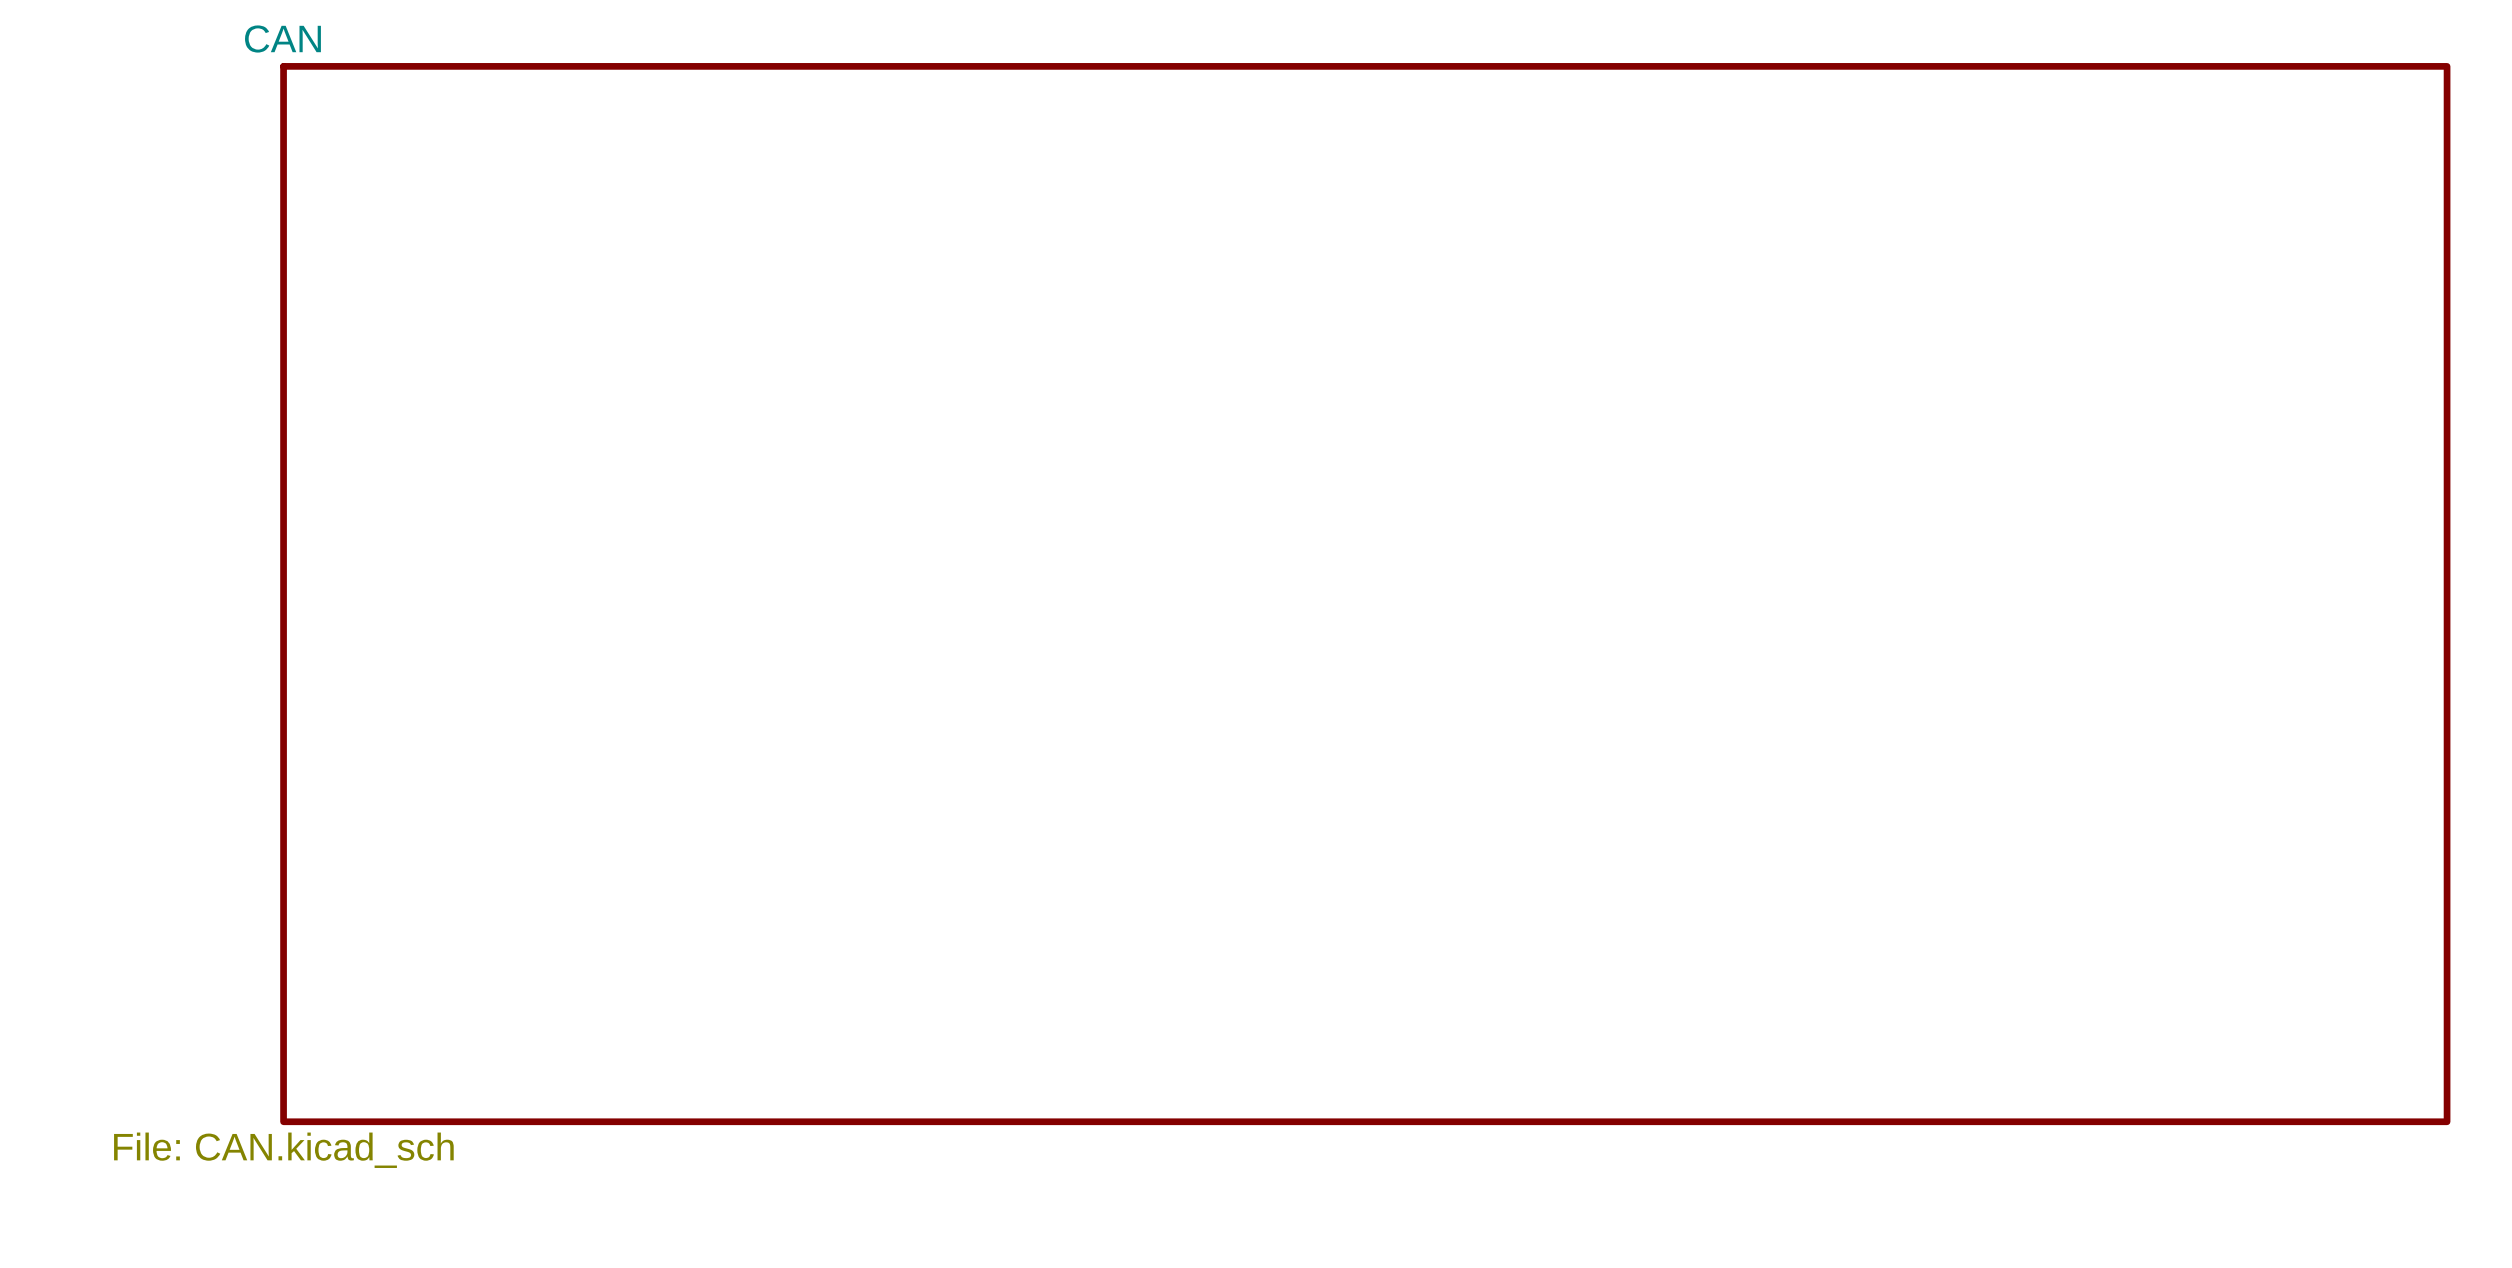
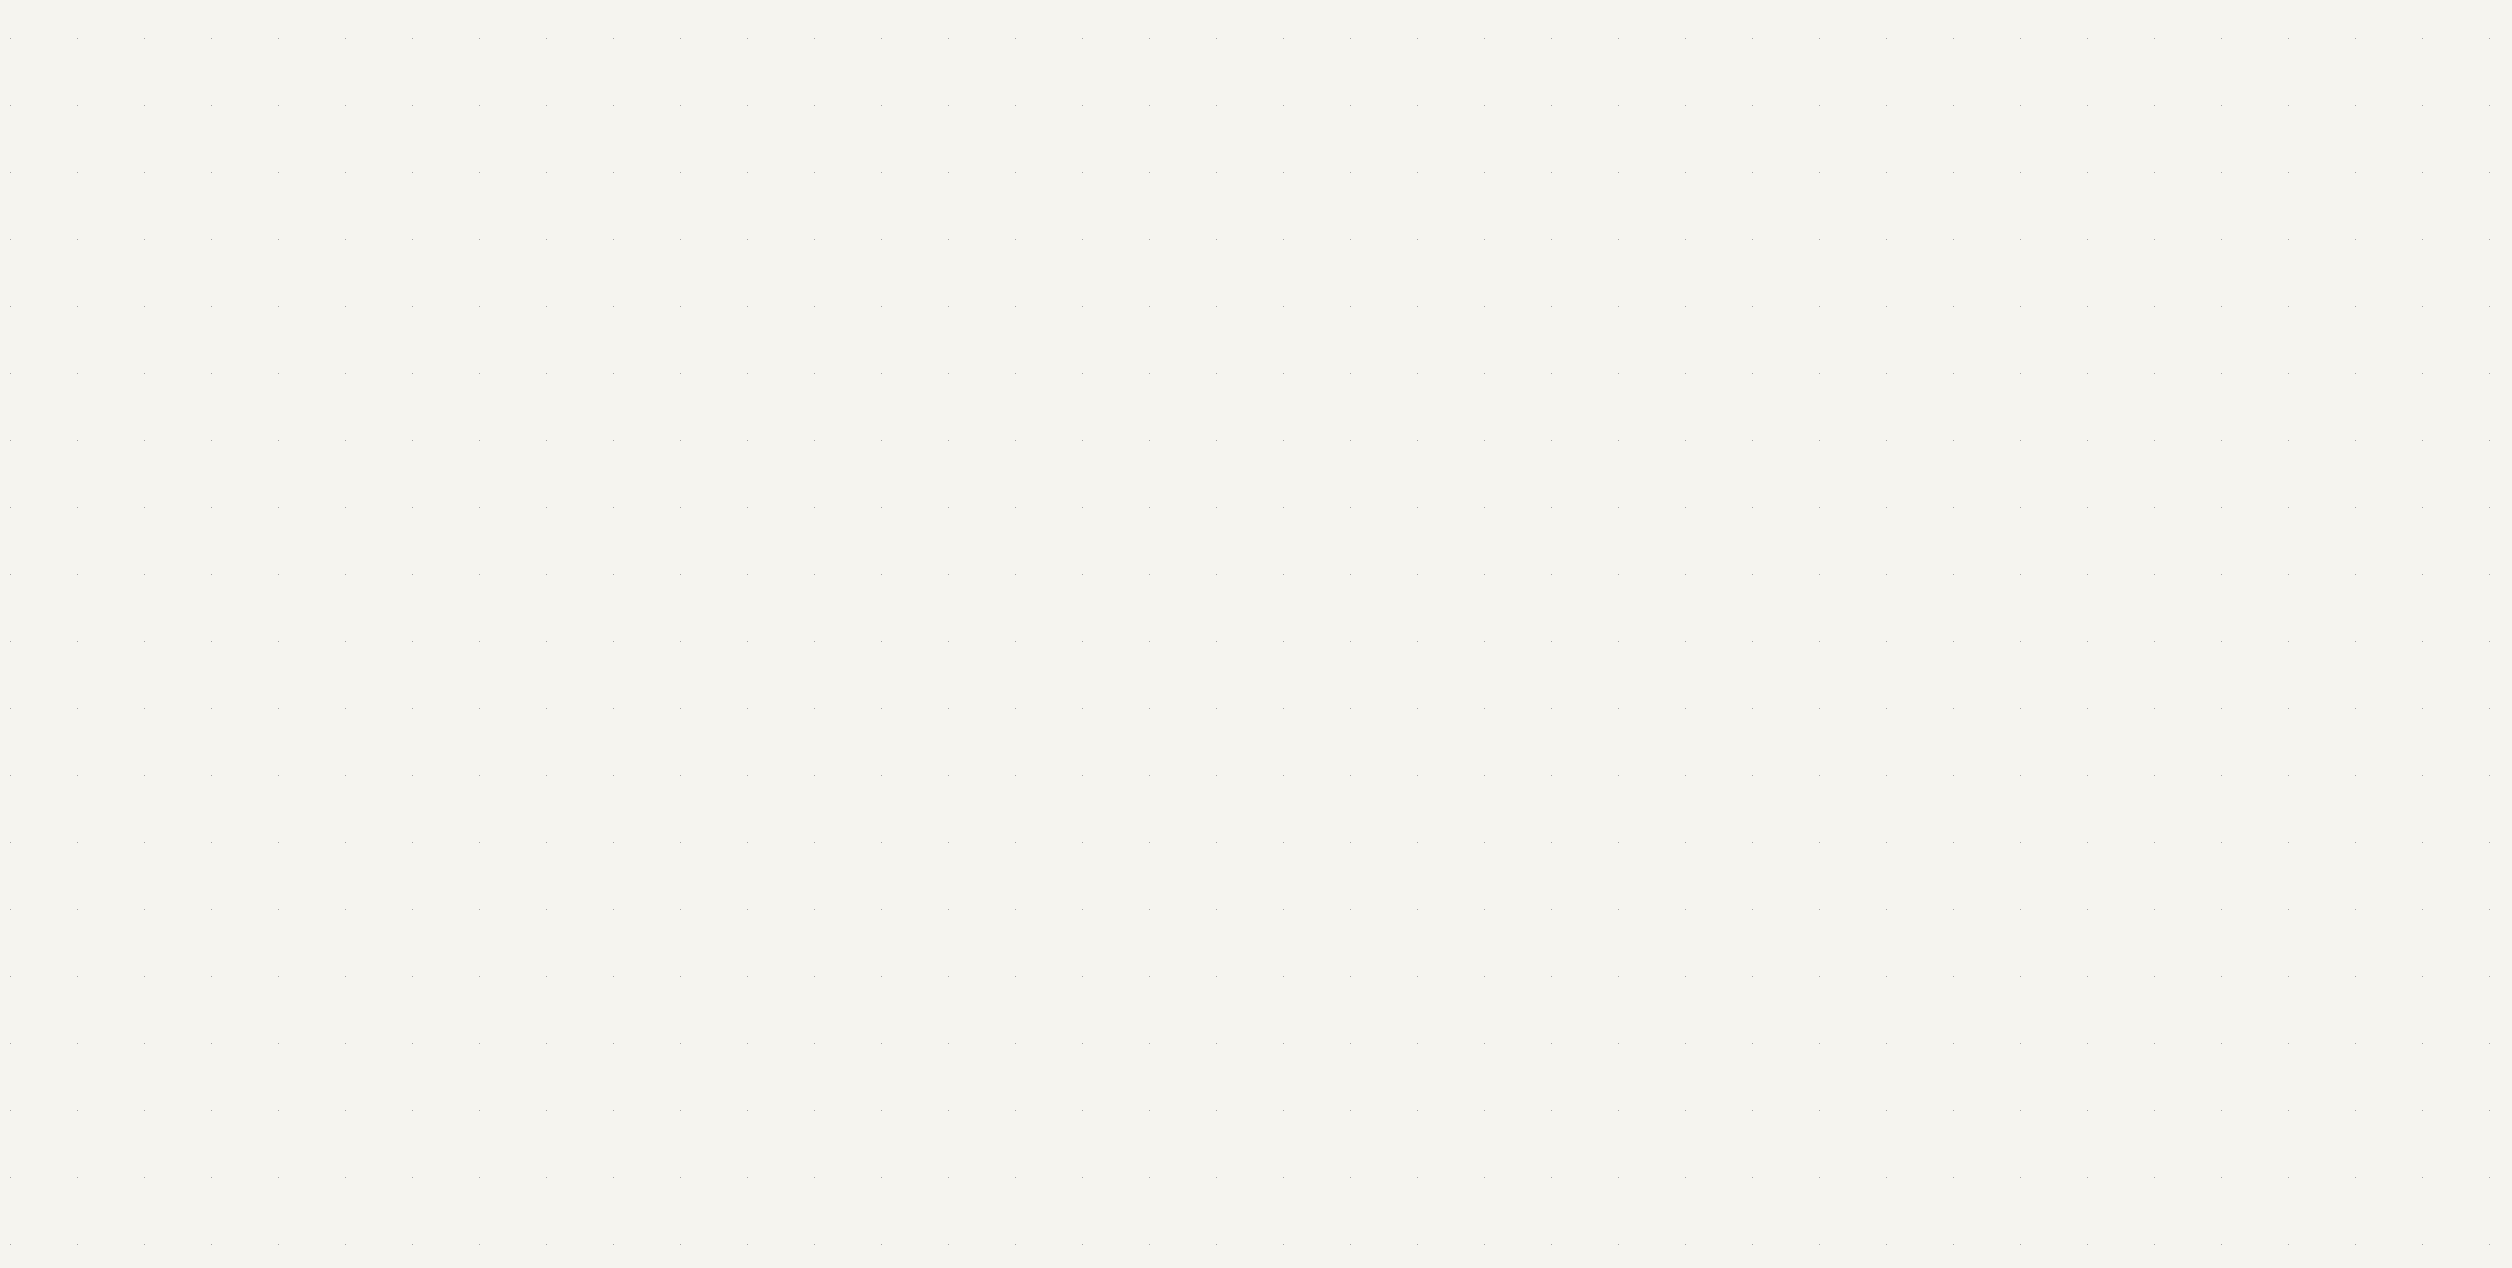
sheet CAN: File: CAN.kicad_sch (1365, 594) -> none

